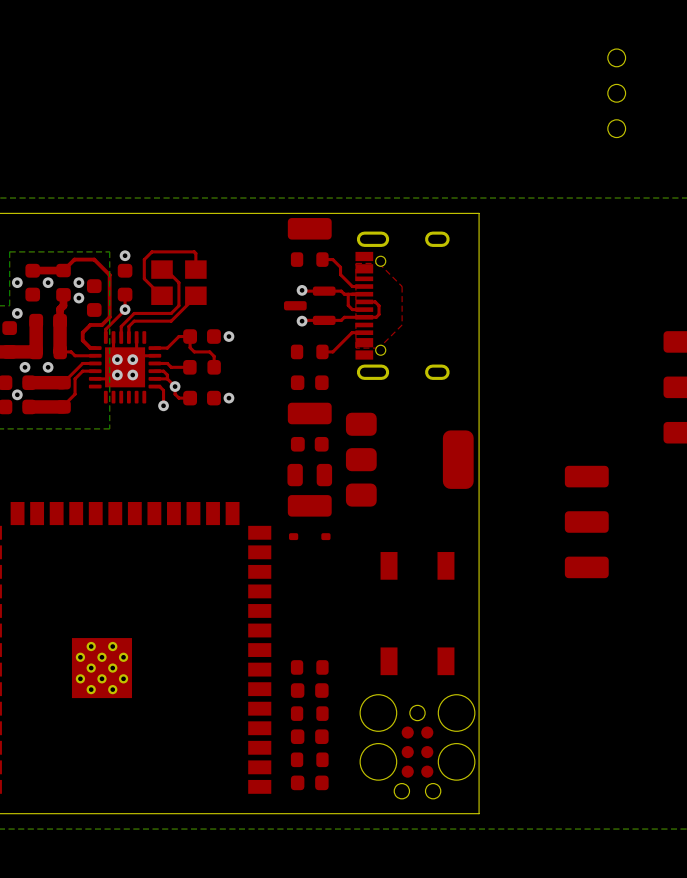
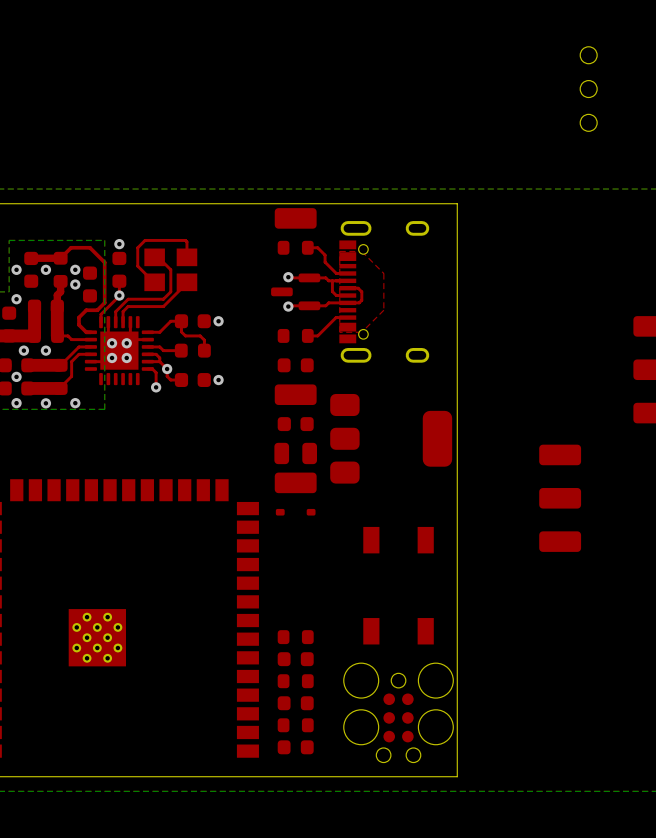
via: none -> (16, 403)
via: none -> (45, 403)
via: none -> (75, 403)

